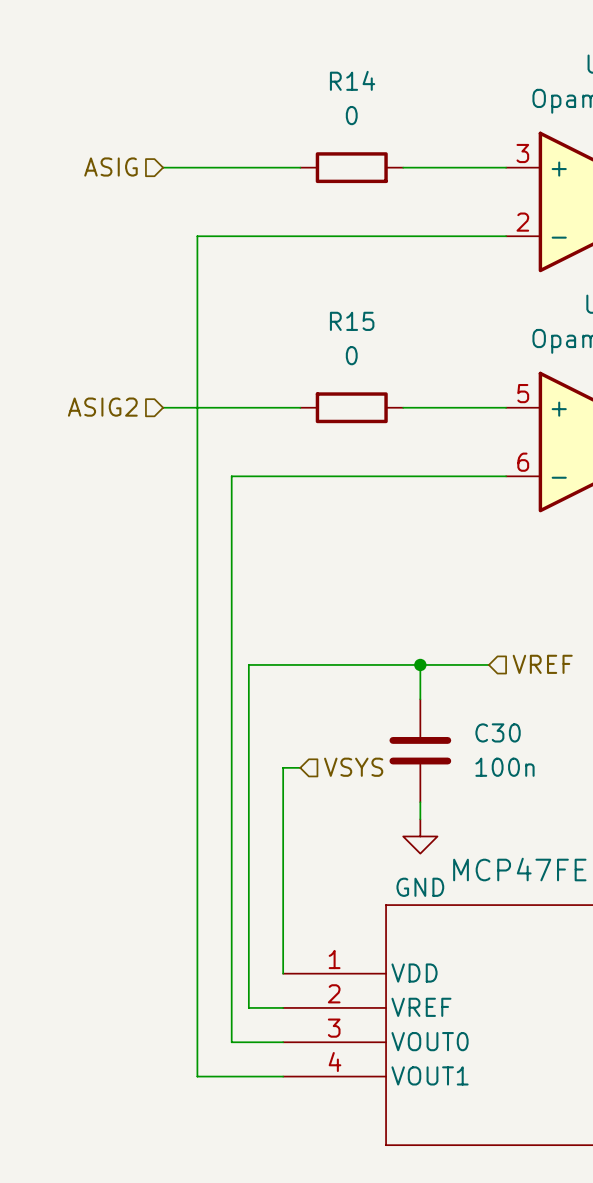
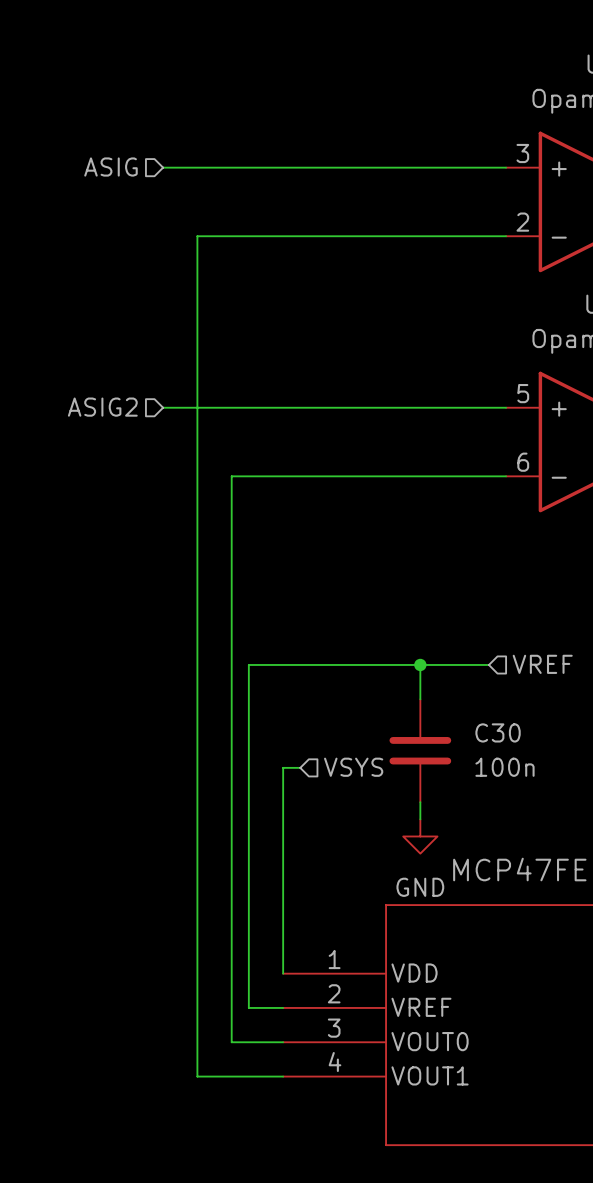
wire: none -> (300, 167) (403, 167)
R14: 0 (351, 167) -> none
wire: none -> (300, 407) (403, 407)
R15: 0 (351, 407) -> none

